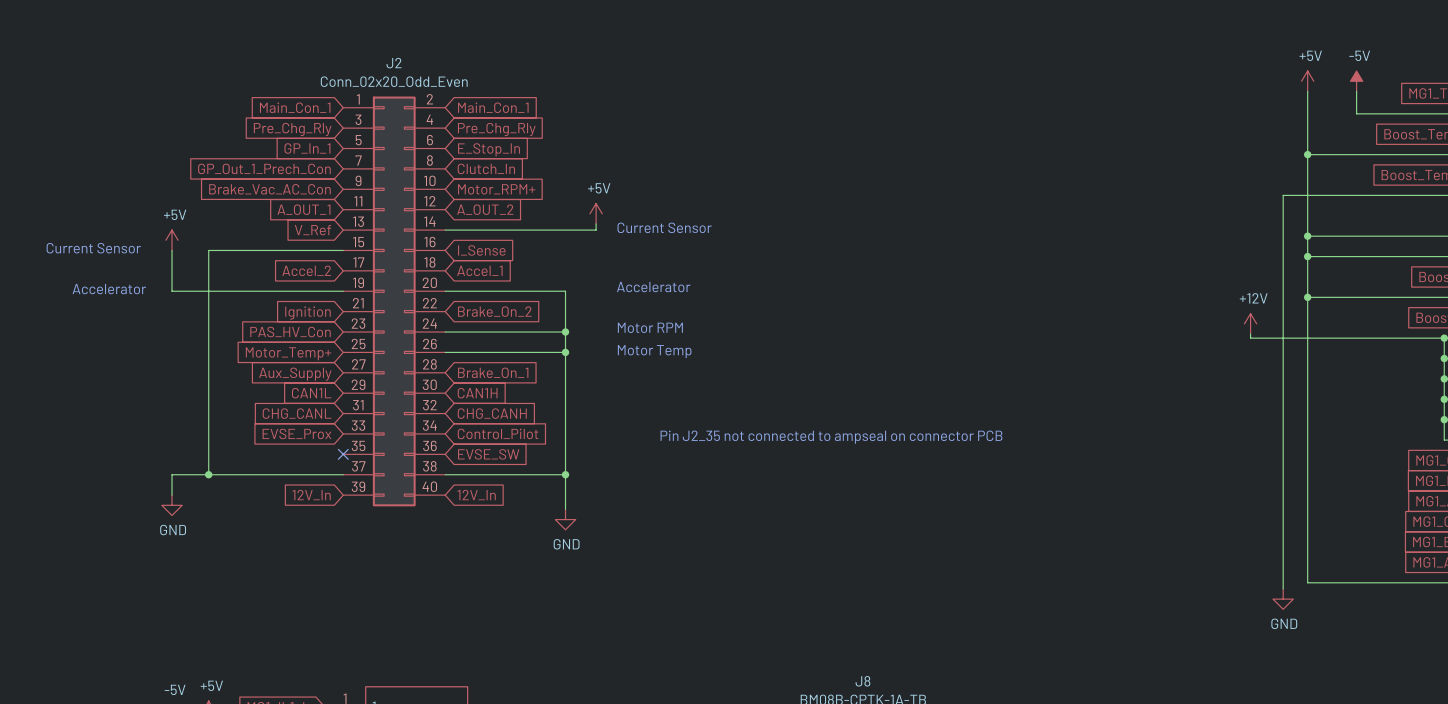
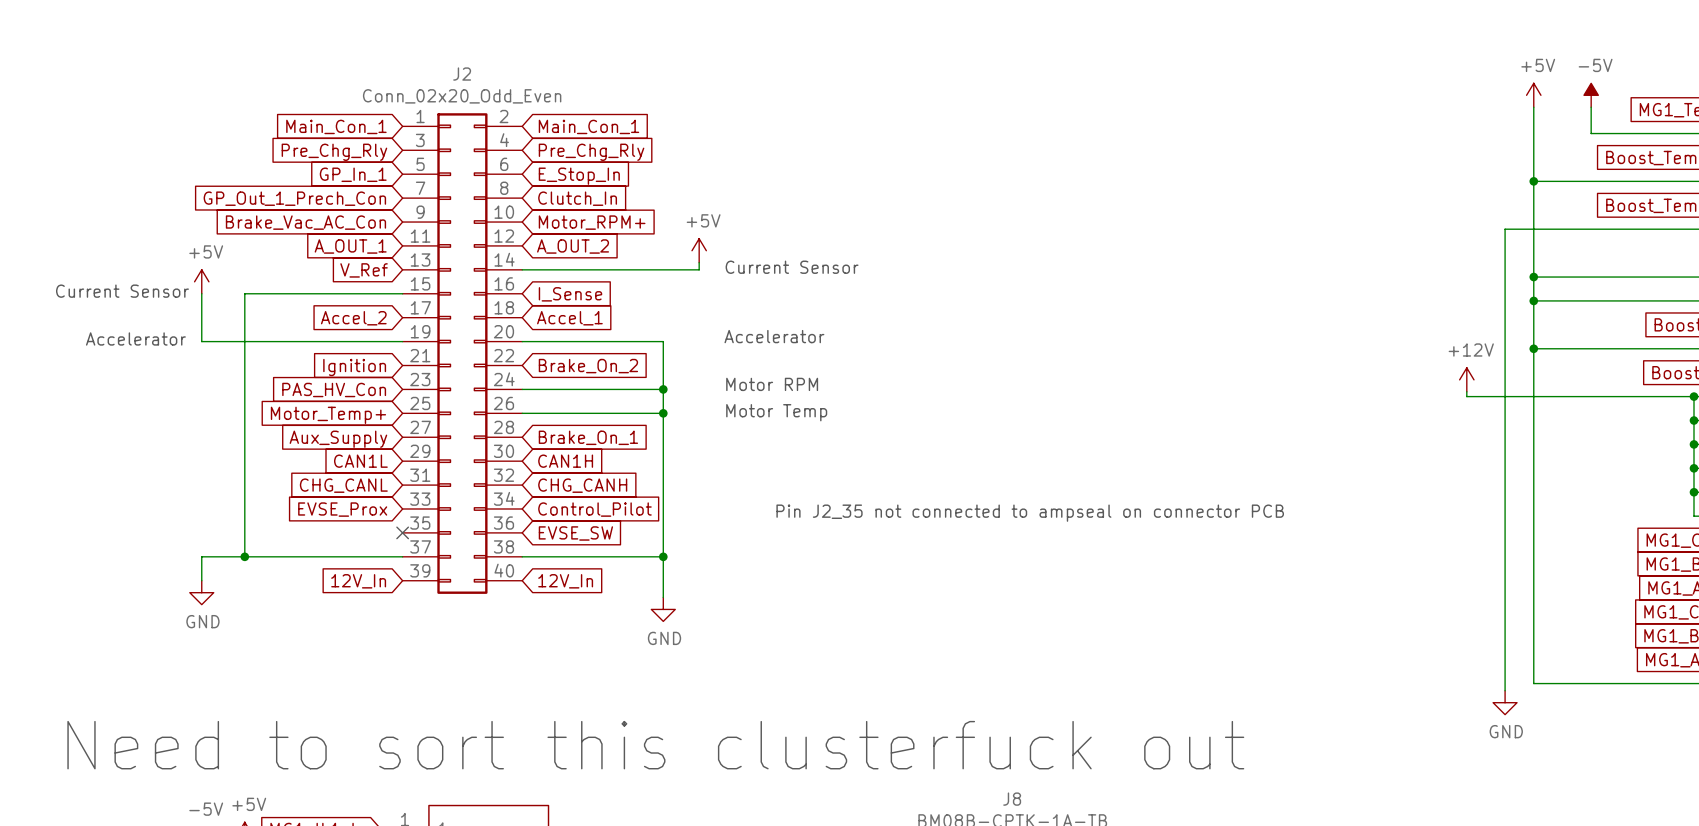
text: none -> Need to sort this clusterfuck out (655, 745)

